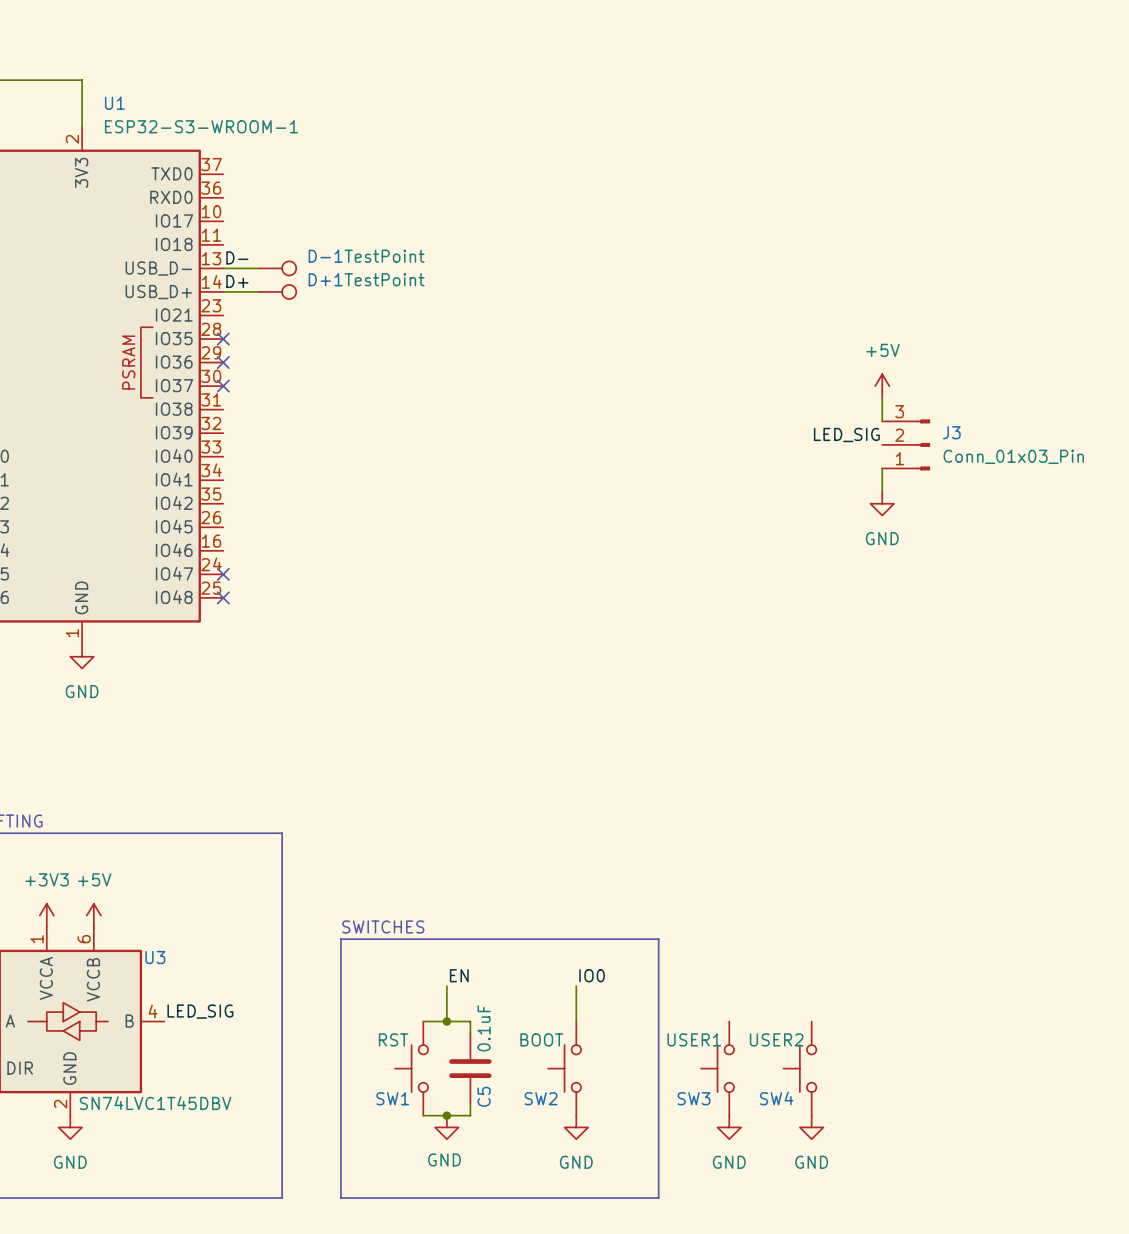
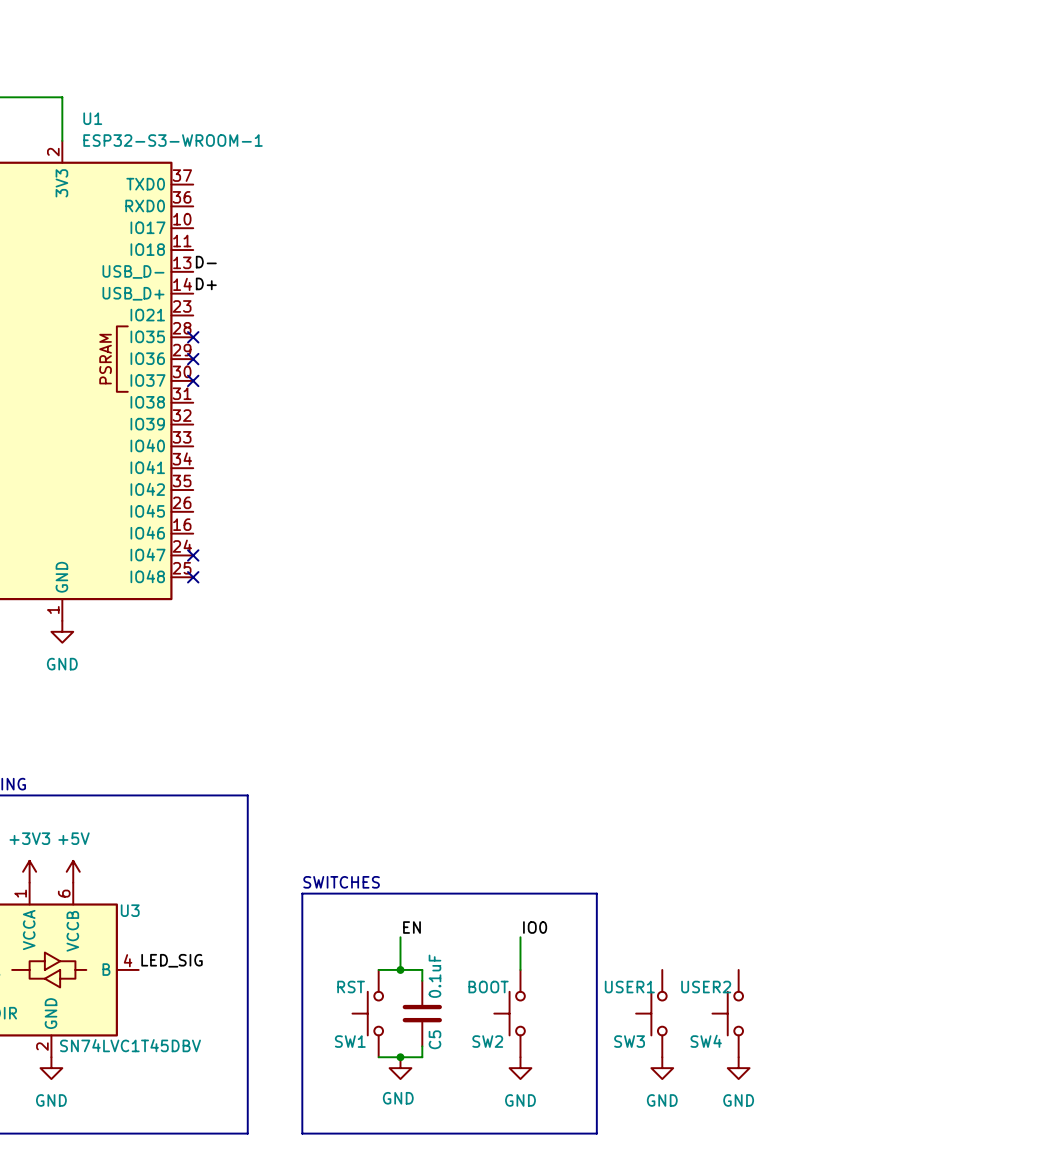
wire: (223, 268) (258, 268) -> none
D-1: TestPoint (277, 268) -> none
wire: (223, 291) (258, 291) -> none
D+1: TestPoint (277, 291) -> none
power symbol: +5V (882, 386) -> none
wire: (882, 397) (882, 421) -> none
label: LED_SIG (846, 434) -> none
J3: Conn_01x03_Pin (906, 444) -> none
wire: (882, 468) (882, 491) -> none
power symbol: GND (882, 503) -> none

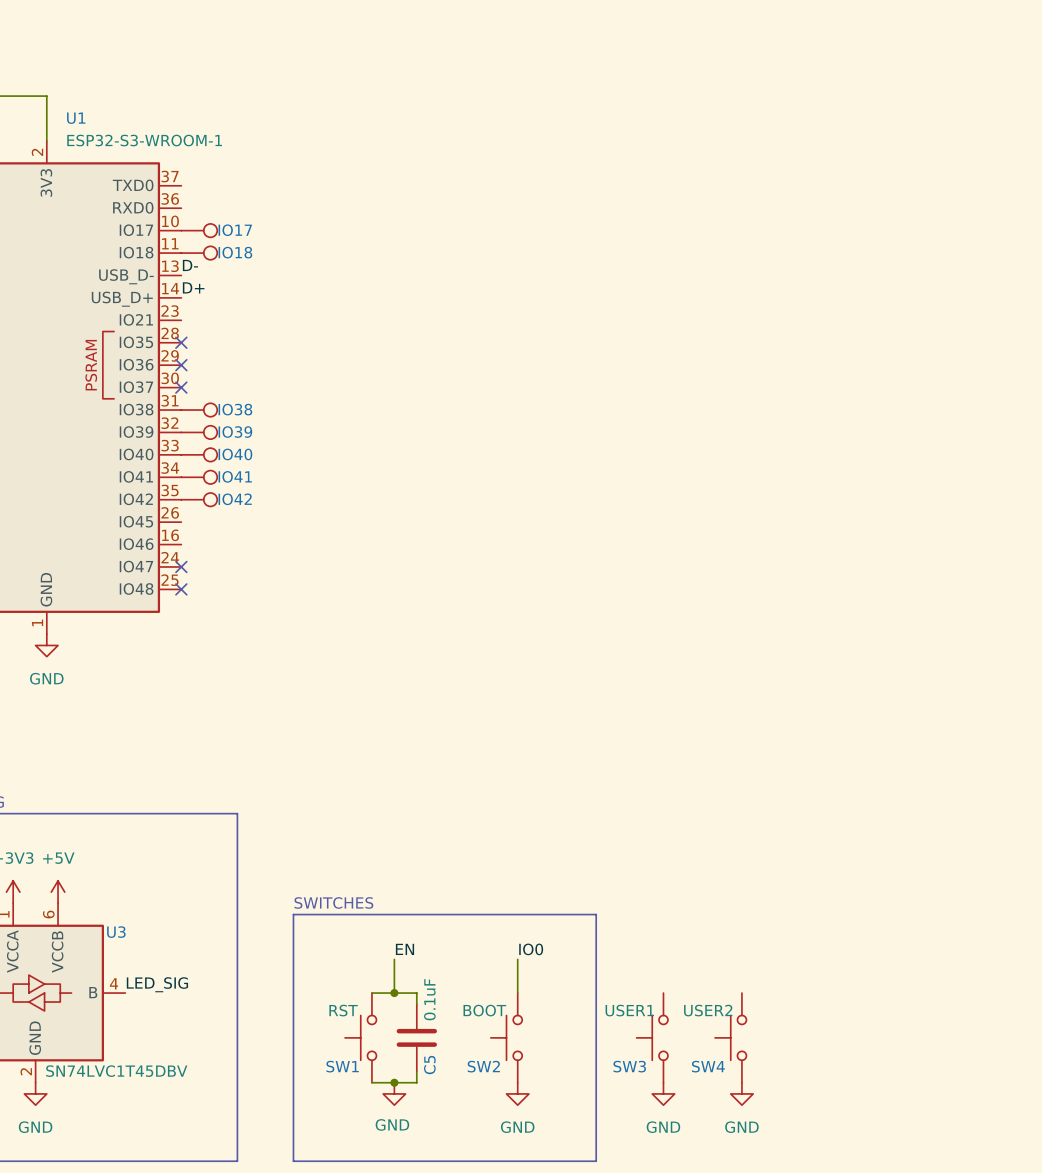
IO17: none -> (199, 230)
IO18: none -> (199, 253)
IO38: none -> (199, 410)
IO39: none -> (199, 432)
IO40: none -> (199, 454)
IO41: none -> (199, 477)
IO42: none -> (199, 499)

